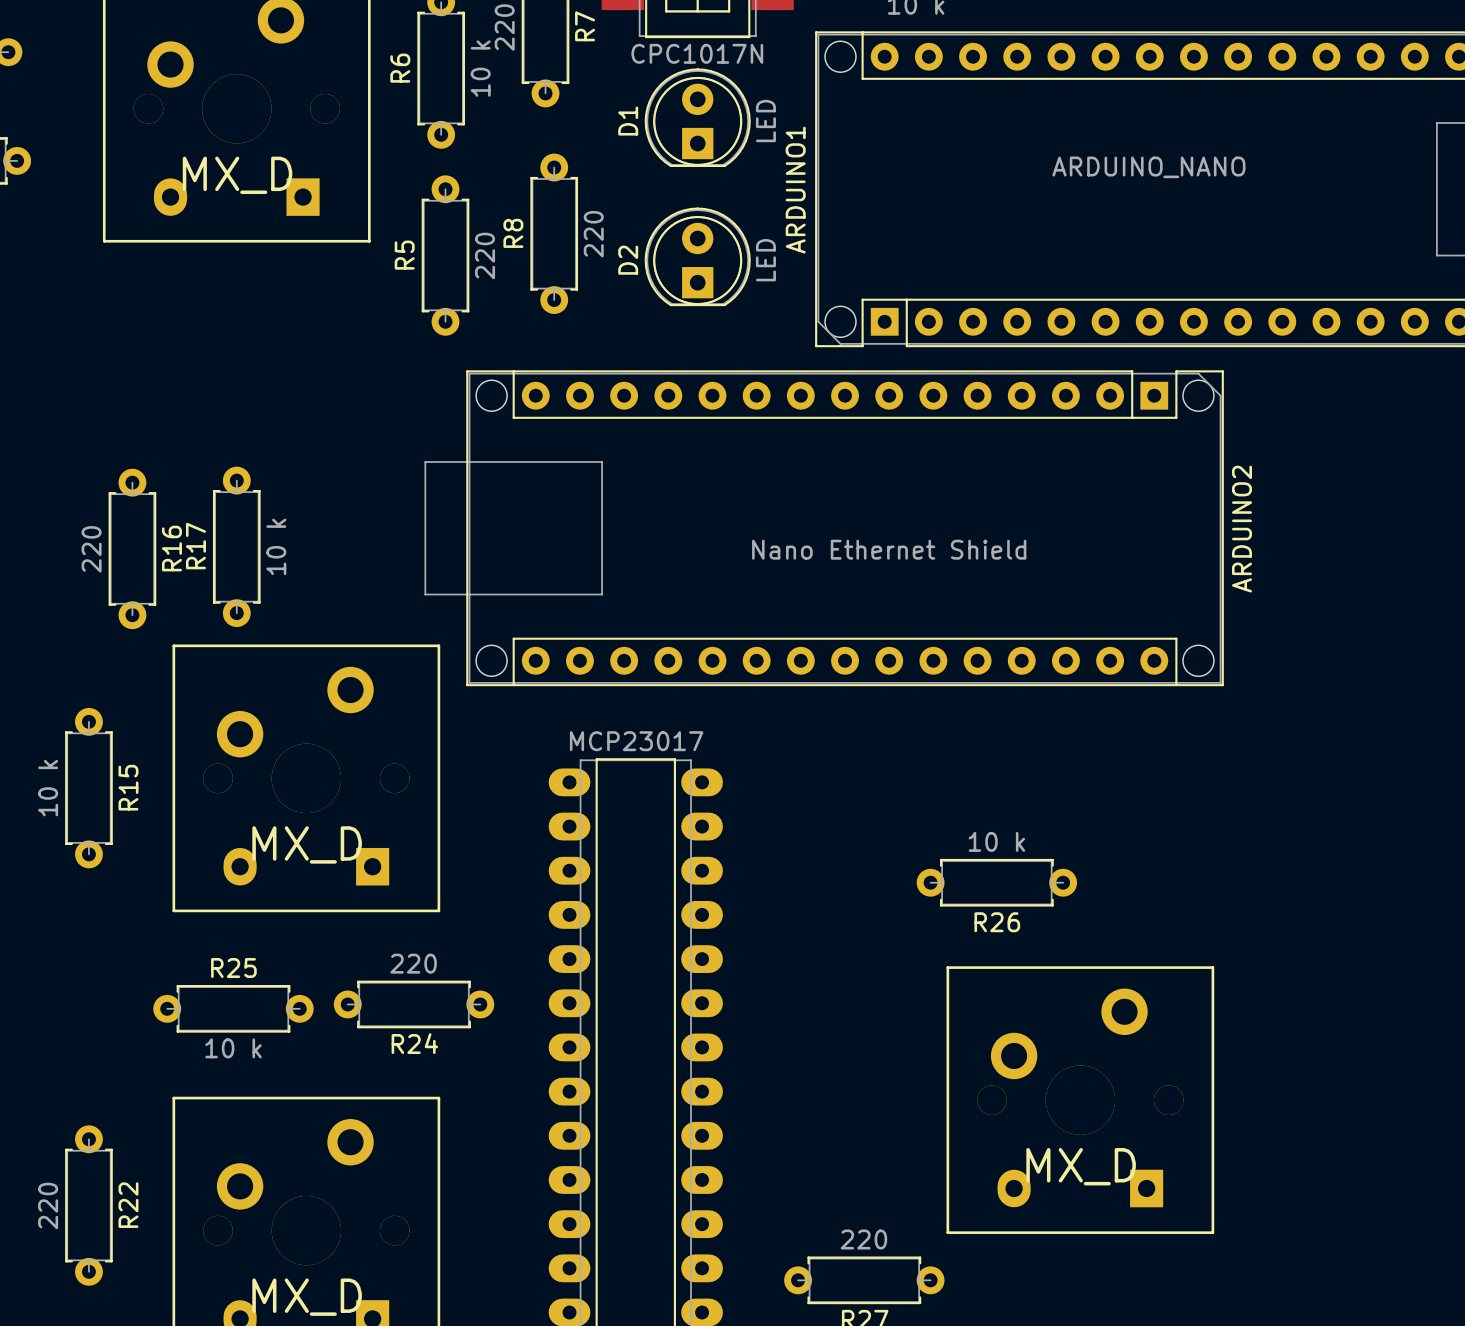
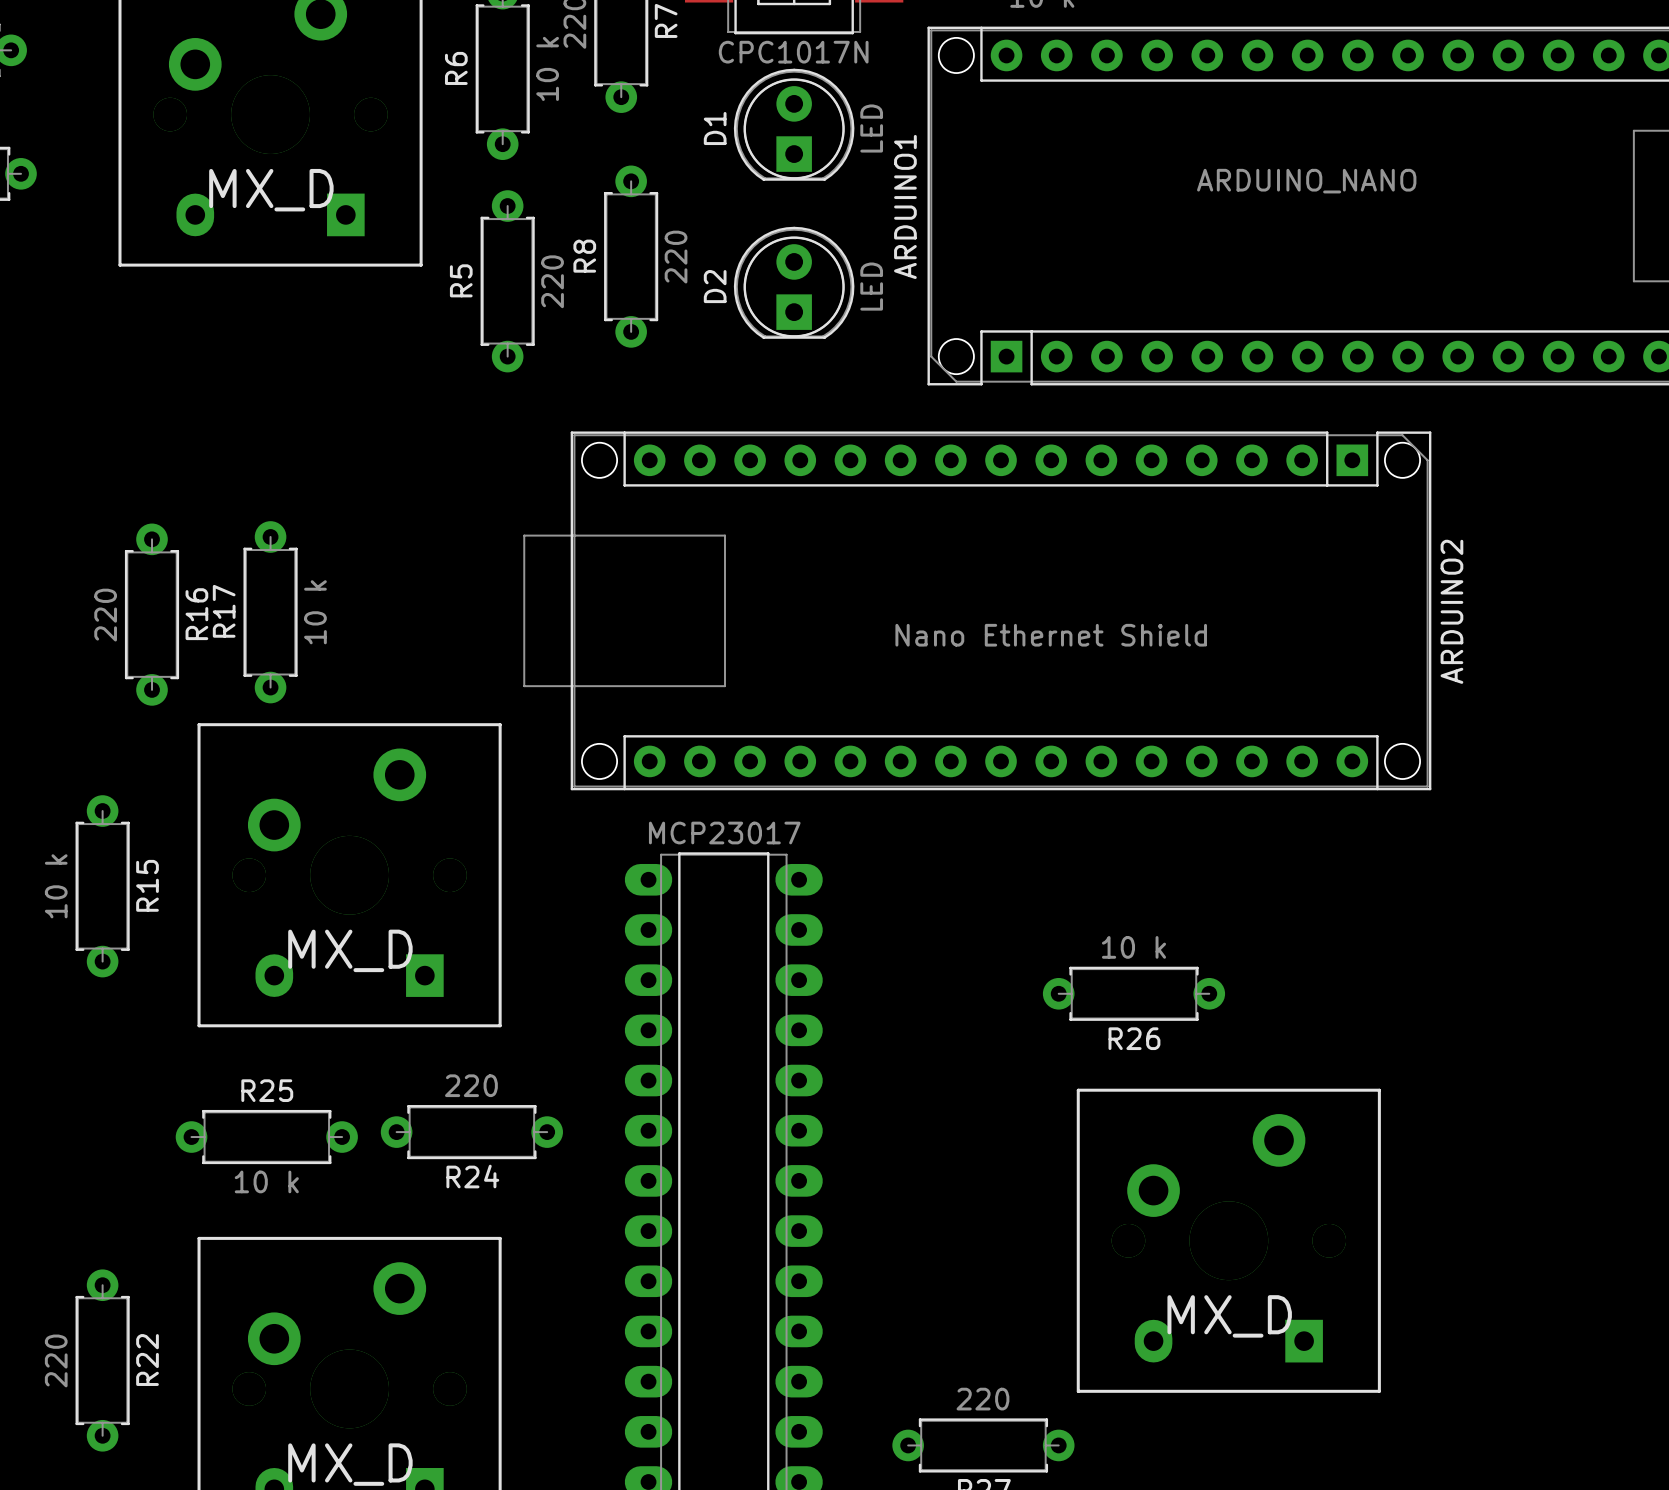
ARDUINO2 position: (824, 528) -> (977, 610)

